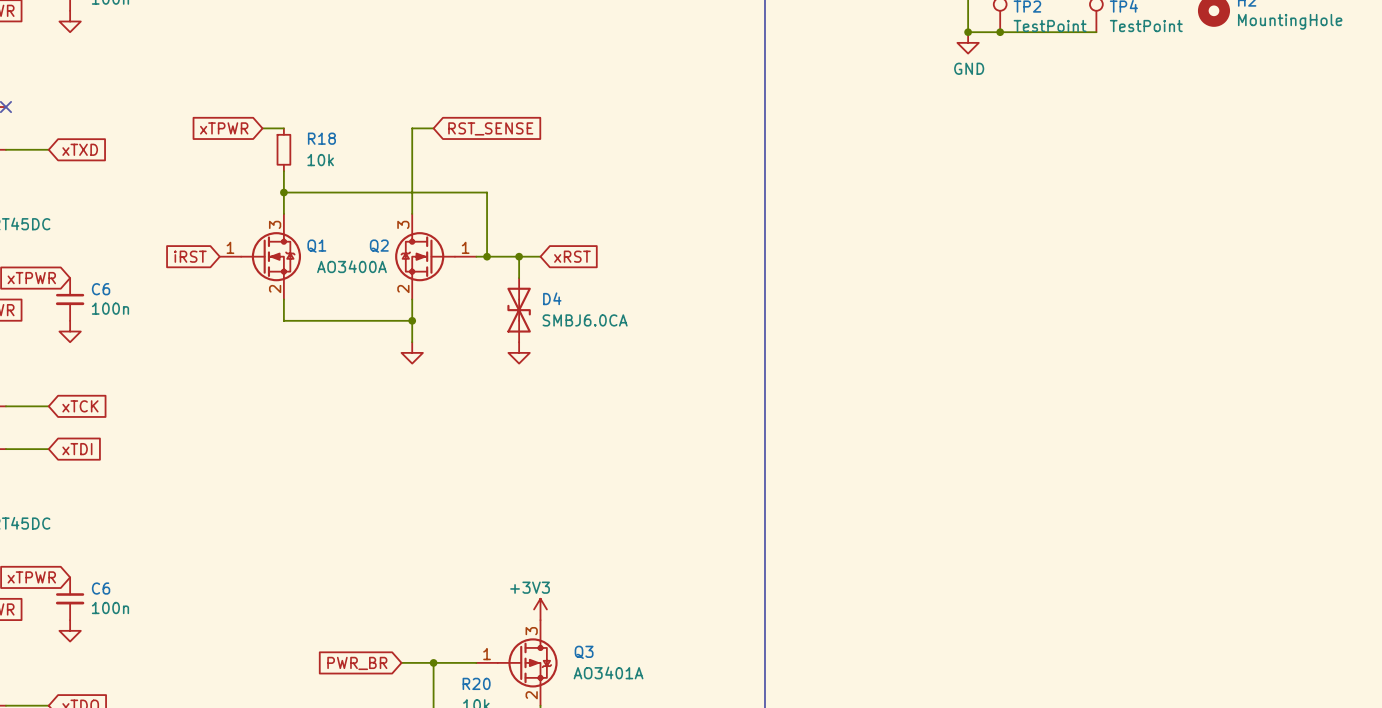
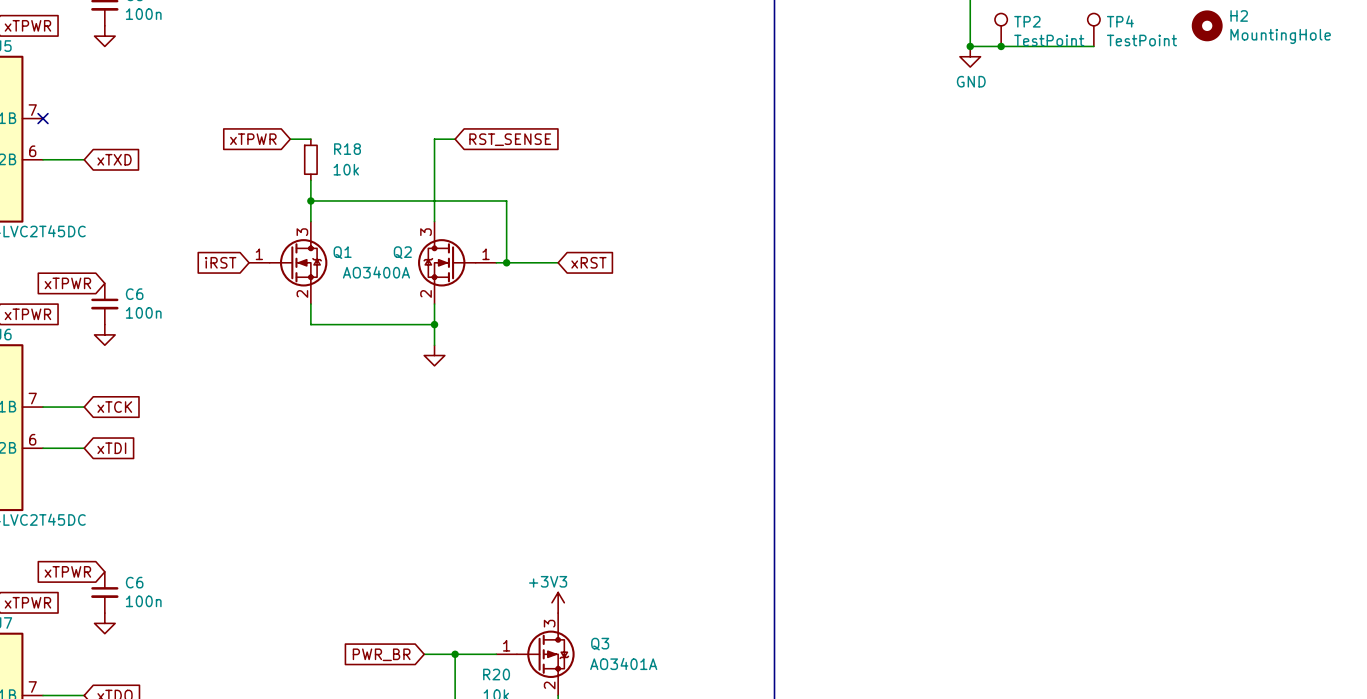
wire: (519, 256) (519, 278) -> none
junction: (519, 256) -> none
D4: SMBJ6.0CA (519, 310) -> none
power symbol: (519, 352) -> none

